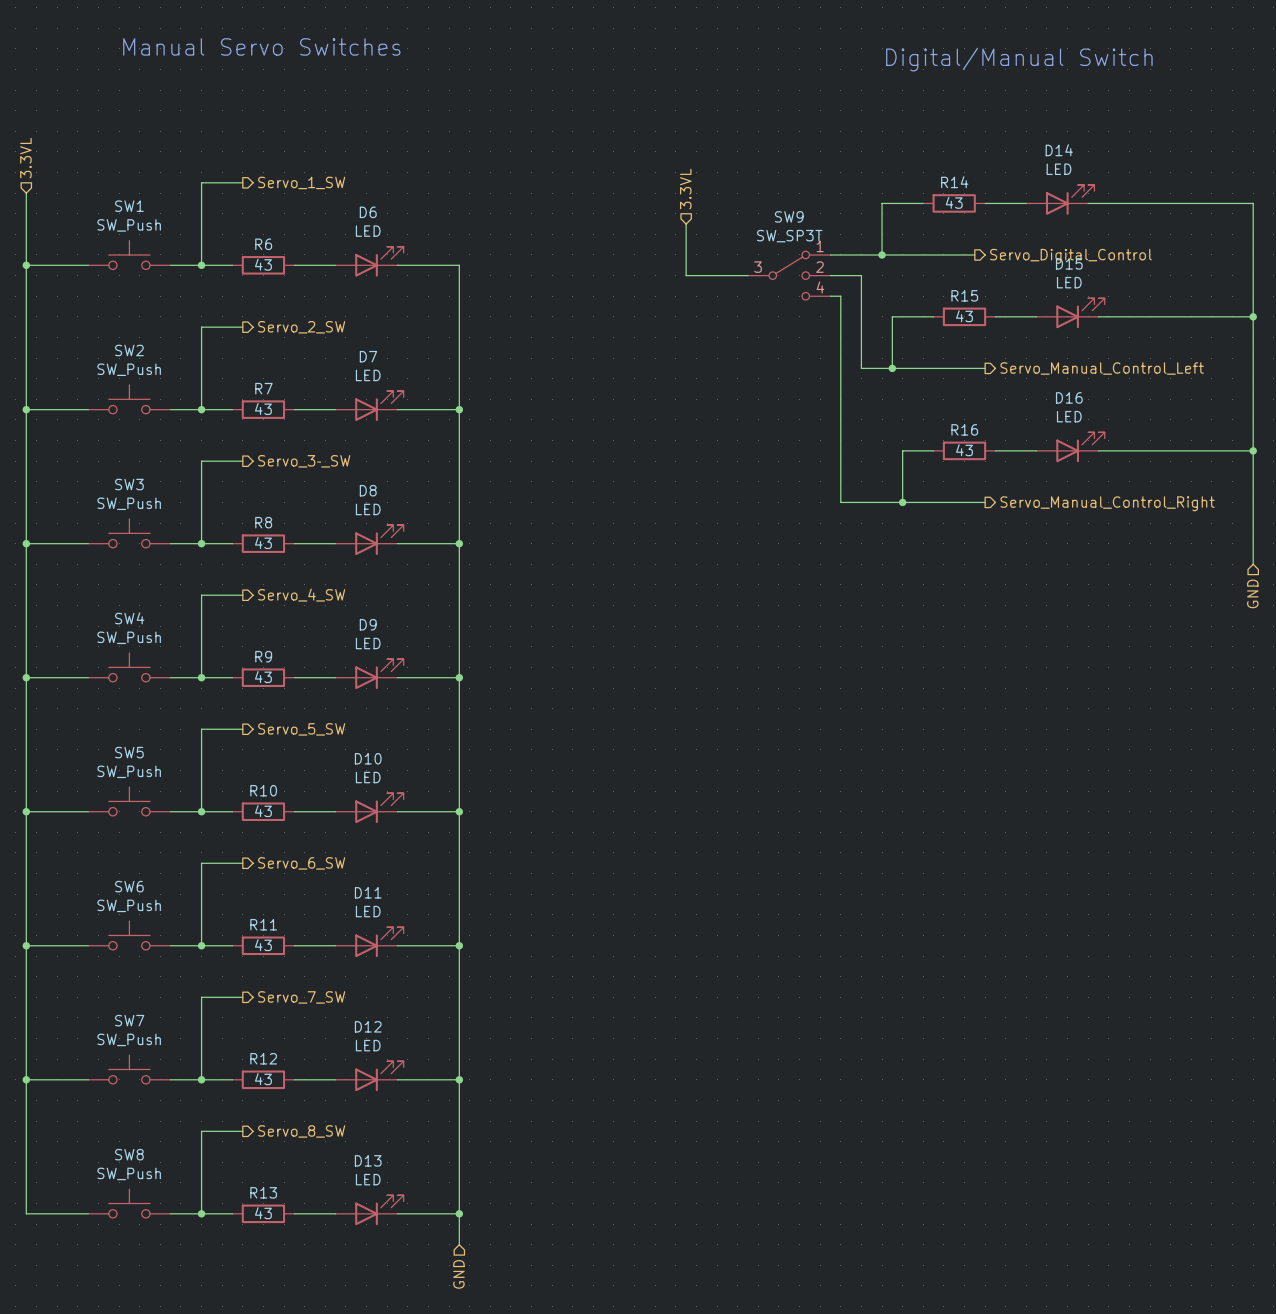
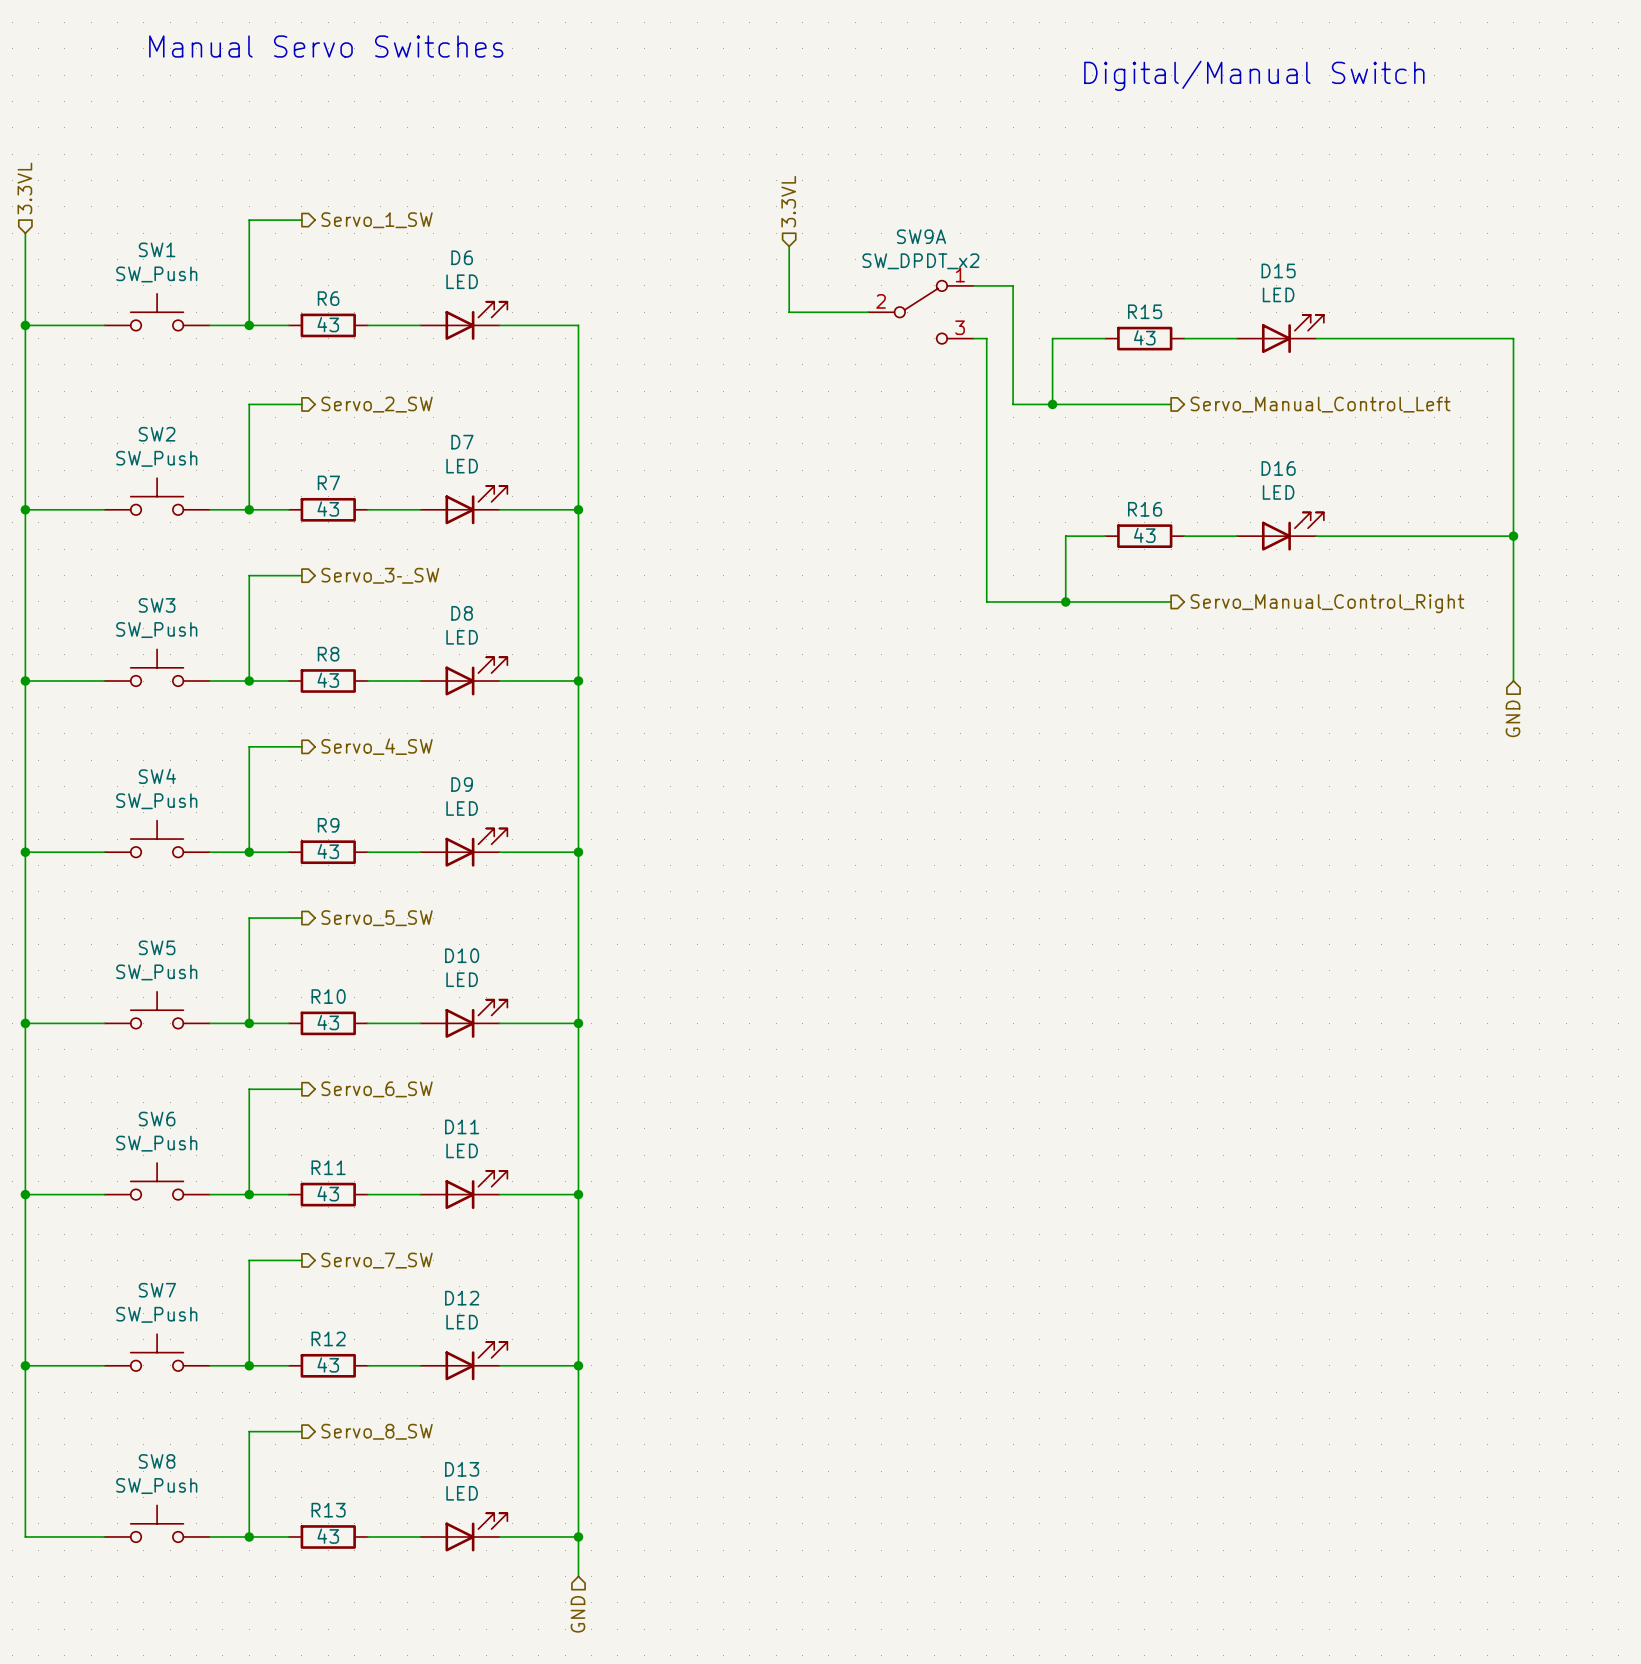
text position: Digital/Manual Switch (1019, 59) -> Digital/Manual Switch (1254, 75)
hierarchical label position: 3.3VL (685, 189) -> 3.3VL (788, 201)
D14: LED (1060, 199) -> none
wire: (923, 203) (882, 203) (882, 254) -> none
R14: 43 (954, 203) -> none
wire: (985, 203) (1026, 203) -> none
wire: (1088, 203) (1253, 203) (1253, 564) -> none
wire: (686, 224) (686, 275) (748, 275) -> (789, 246) (789, 312) (868, 312)
wire: none -> (973, 285) (1013, 285) (1013, 404) (1171, 404)
SW9A: none -> SW_DPDT_x2 (920, 312)
wire: (830, 254) (974, 254) -> none
junction: (882, 254) -> none
hierarchical label: Servo_Digital_Control (1070, 256) -> none
wire: none -> (973, 338) (986, 338) (986, 601) (1171, 601)
SW9: SW_SP3T (789, 275) -> none
wire: none -> (1052, 338) (1052, 404)
wire: (861, 275) (861, 368) (985, 368) -> (1092, 338) (1105, 338)
wire: none -> (1315, 338) (1513, 338) (1513, 681)
wire: (830, 296) (840, 296) (840, 430) -> (1105, 536) (1065, 536)
D15 position: (1070, 313) -> (1280, 333)
wire: (933, 316) (892, 316) (892, 368) -> none
R15 position: (964, 316) -> (1144, 338)
wire: (995, 316) (1036, 316) -> (1184, 338) (1236, 338)
wire: (1098, 316) (1253, 316) -> none
junction: (1253, 316) -> none
junction: none -> (1052, 404)
junction: (892, 368) -> none
hierarchical label position: Servo_Manual_Control_Left (1102, 368) -> Servo_Manual_Control_Left (1320, 404)
junction: none -> (1513, 536)
D16 position: (1070, 447) -> (1280, 531)
wire: (933, 450) (902, 450) (902, 502) -> none
R16 position: (964, 450) -> (1144, 536)
wire: (995, 450) (1036, 450) -> (1184, 536) (1236, 536)
wire: (1098, 450) (1253, 450) -> (1315, 536) (1513, 536)
junction: (1253, 450) -> none
wire: (840, 481) (840, 502) (985, 502) -> none
junction: none -> (1065, 601)
junction: (902, 502) -> none
hierarchical label position: Servo_Manual_Control_Right (1107, 503) -> Servo_Manual_Control_Right (1327, 603)
hierarchical label position: GND (1252, 593) -> GND (1513, 718)

